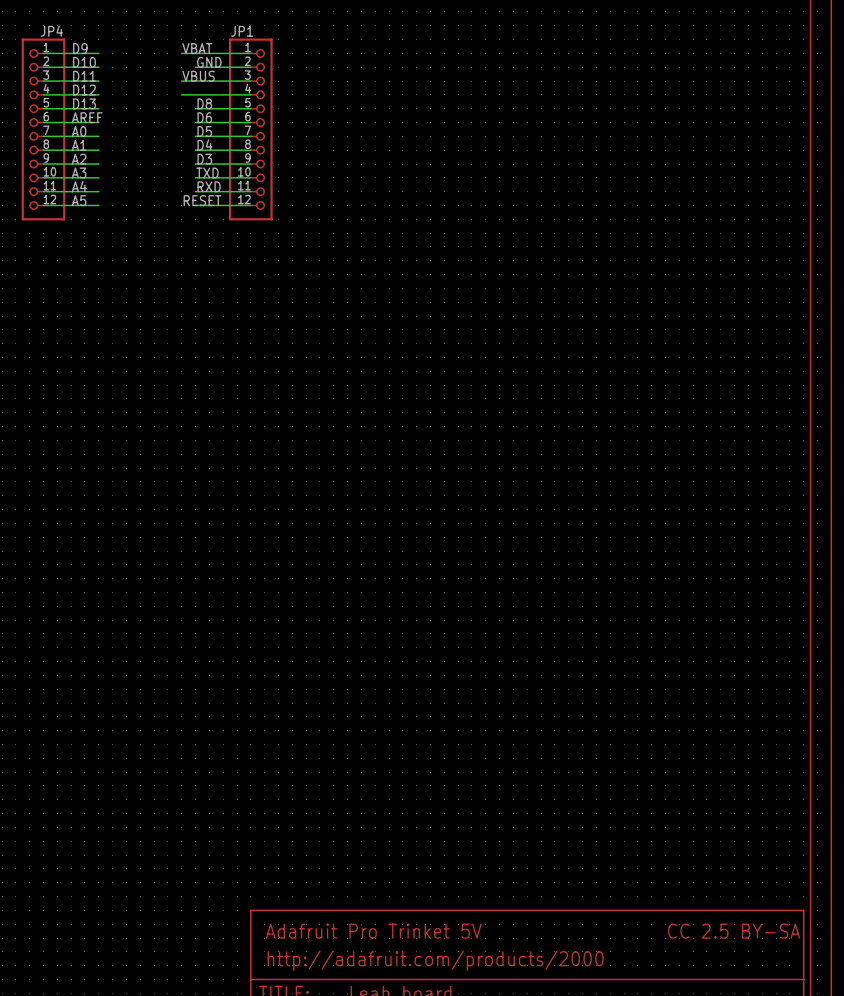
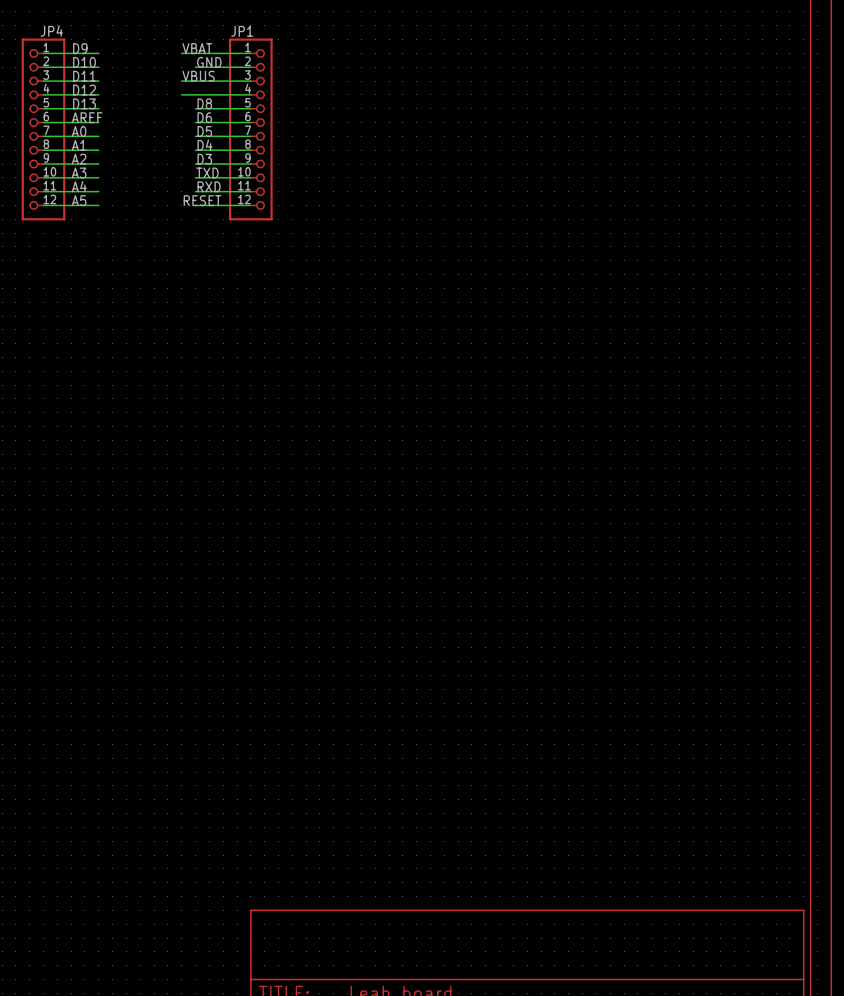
text: Adafruit Pro Trinket 5V (373, 931) -> none
text: CC 2.5 BY-SA (734, 931) -> none
text: http://adafruit.com/products/2000 (435, 960) -> none

